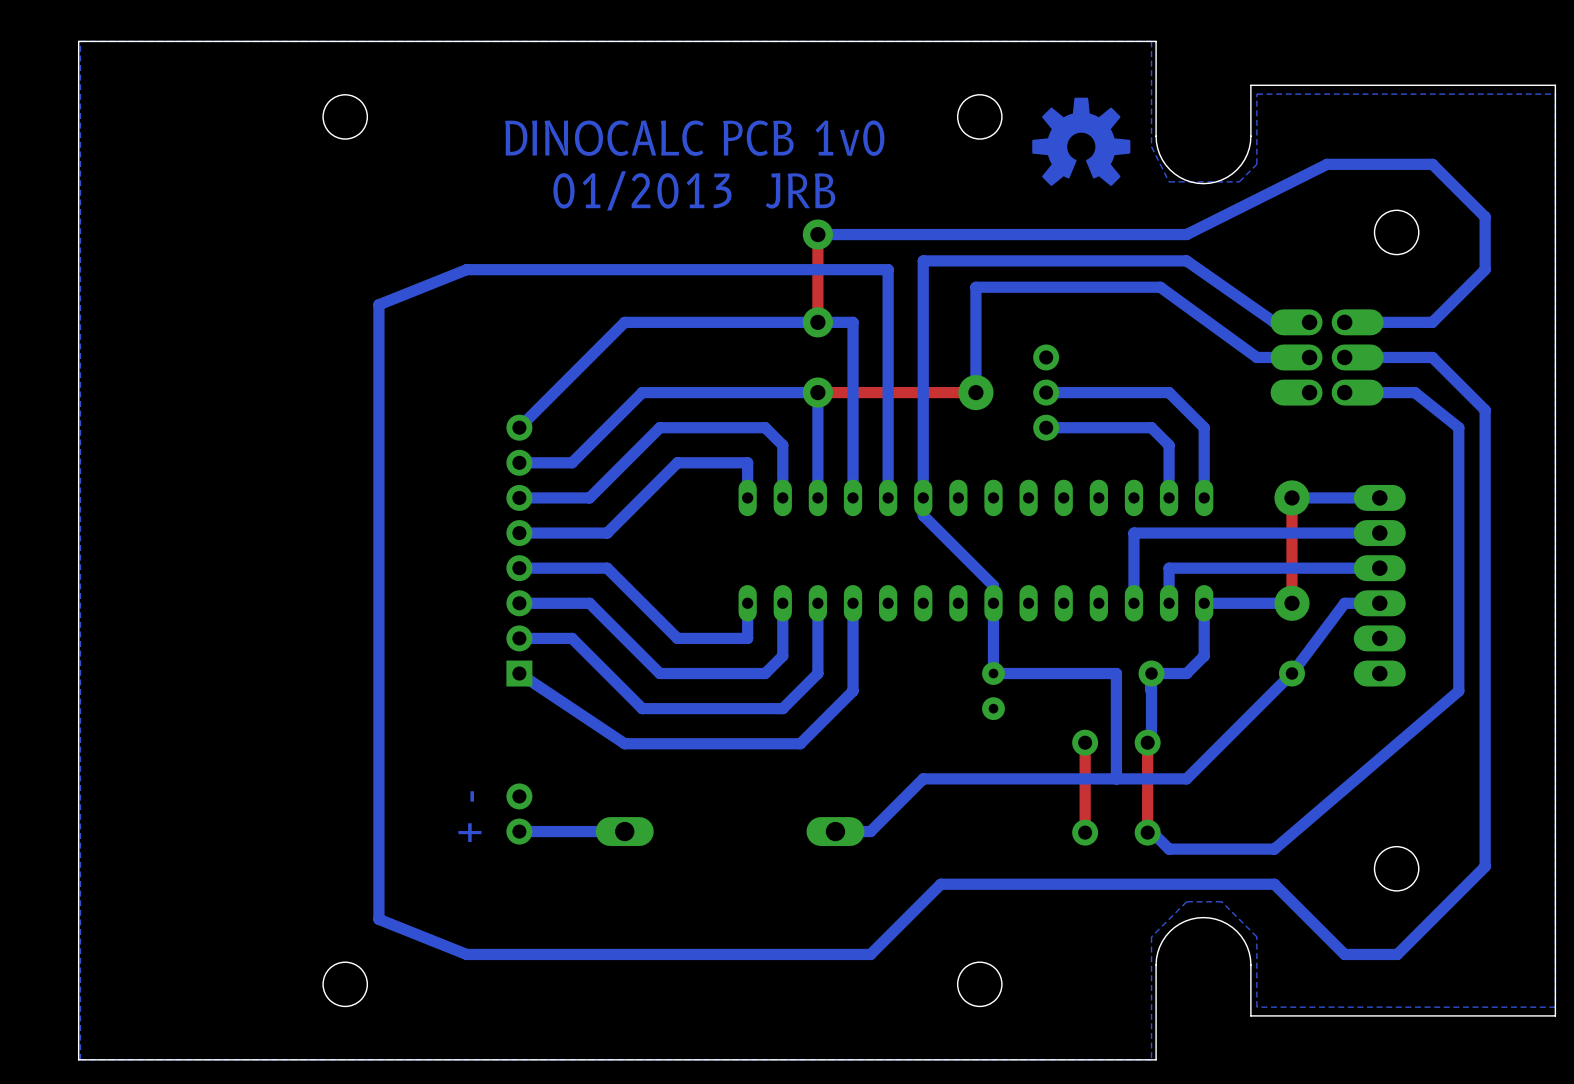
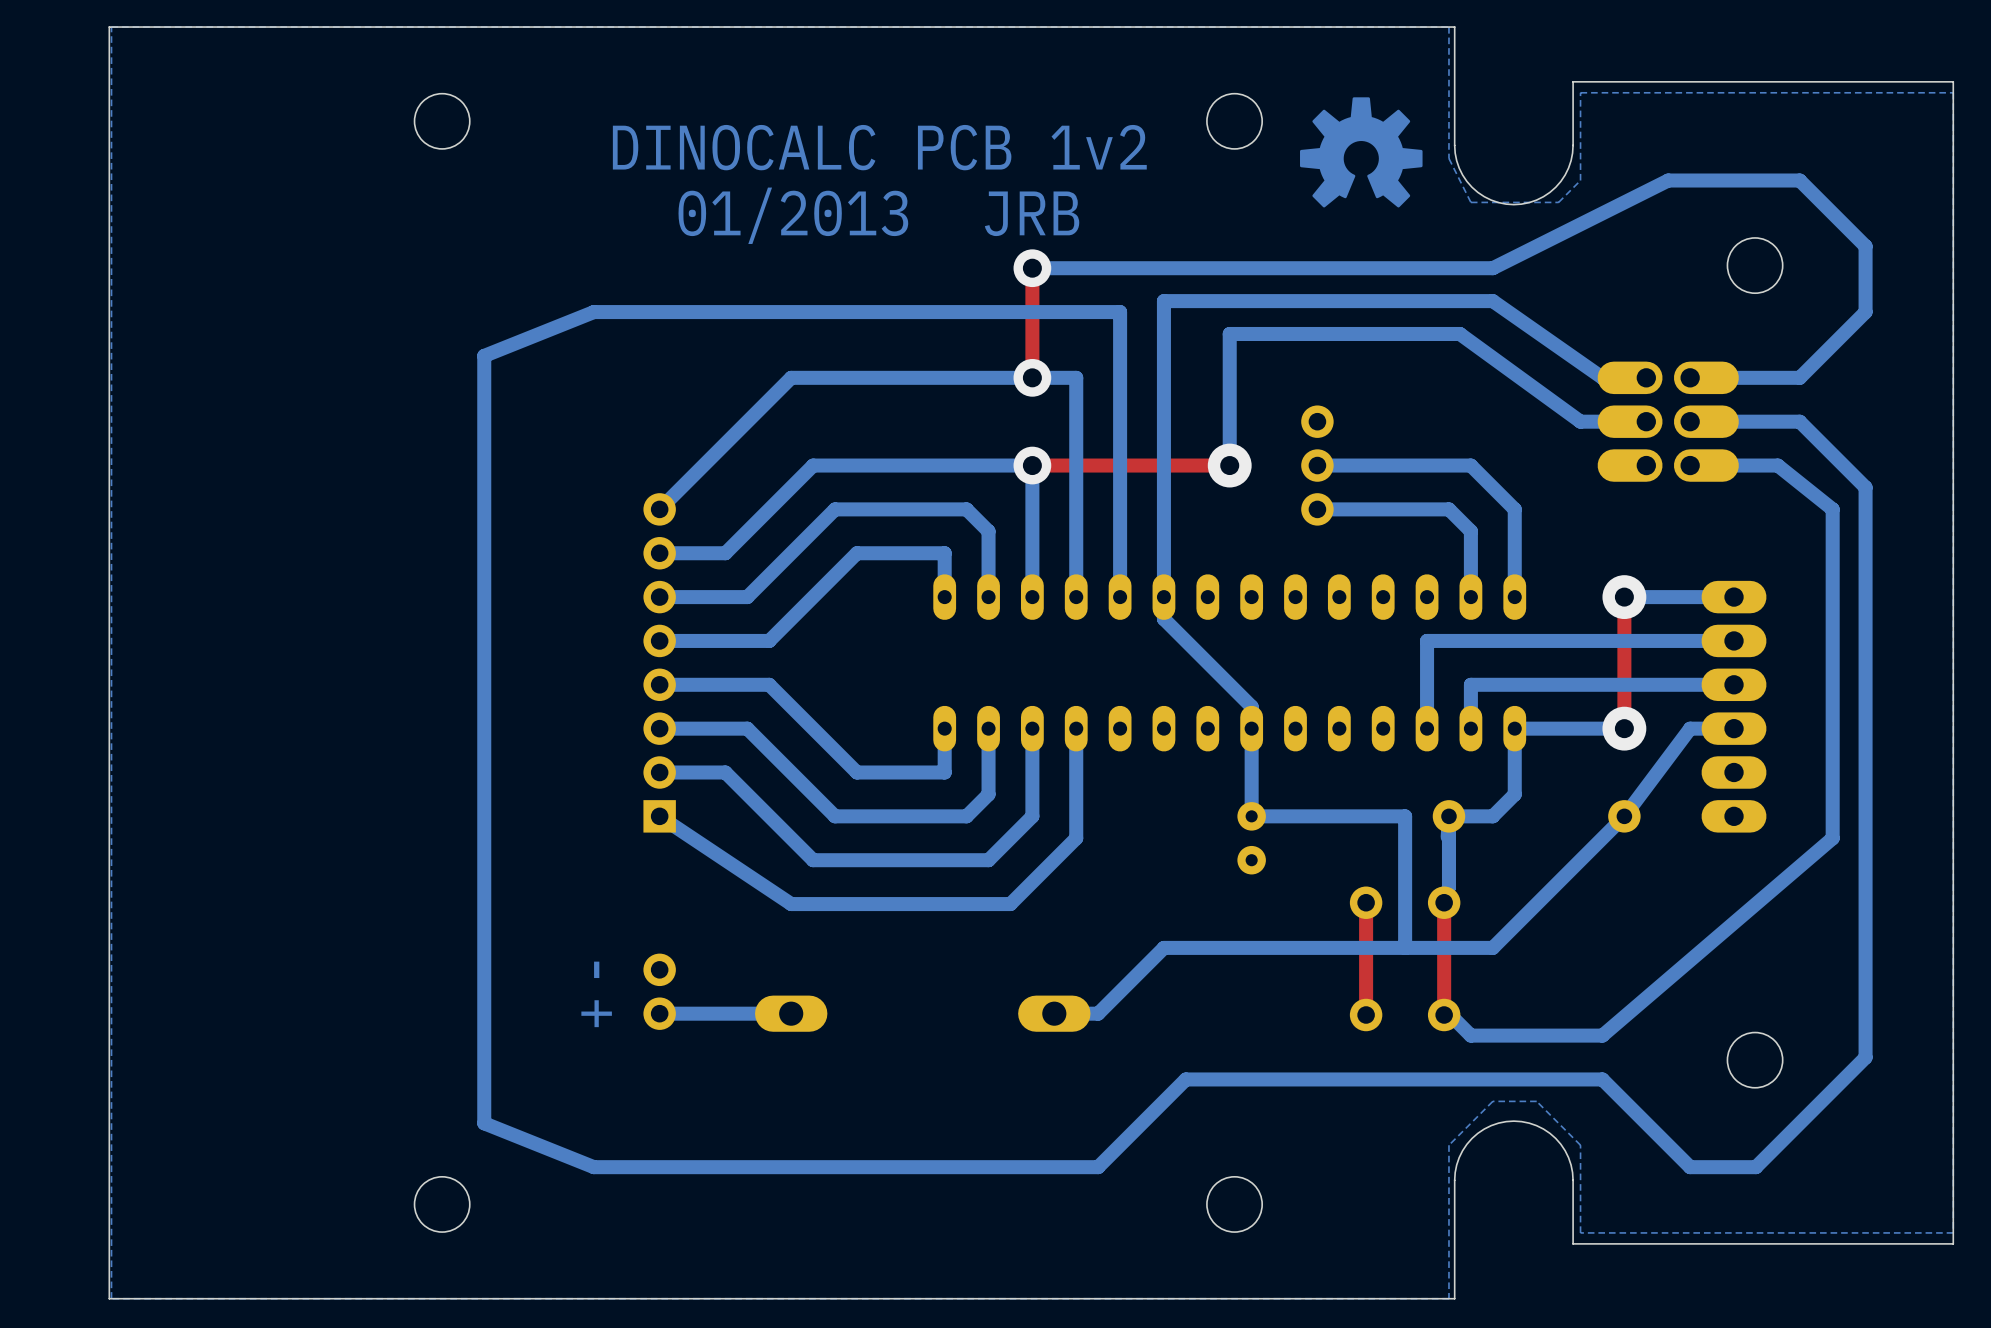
text: DINOCALC PCB 1v0 (694, 138) -> DINOCALC PCB 1v2 (879, 147)

